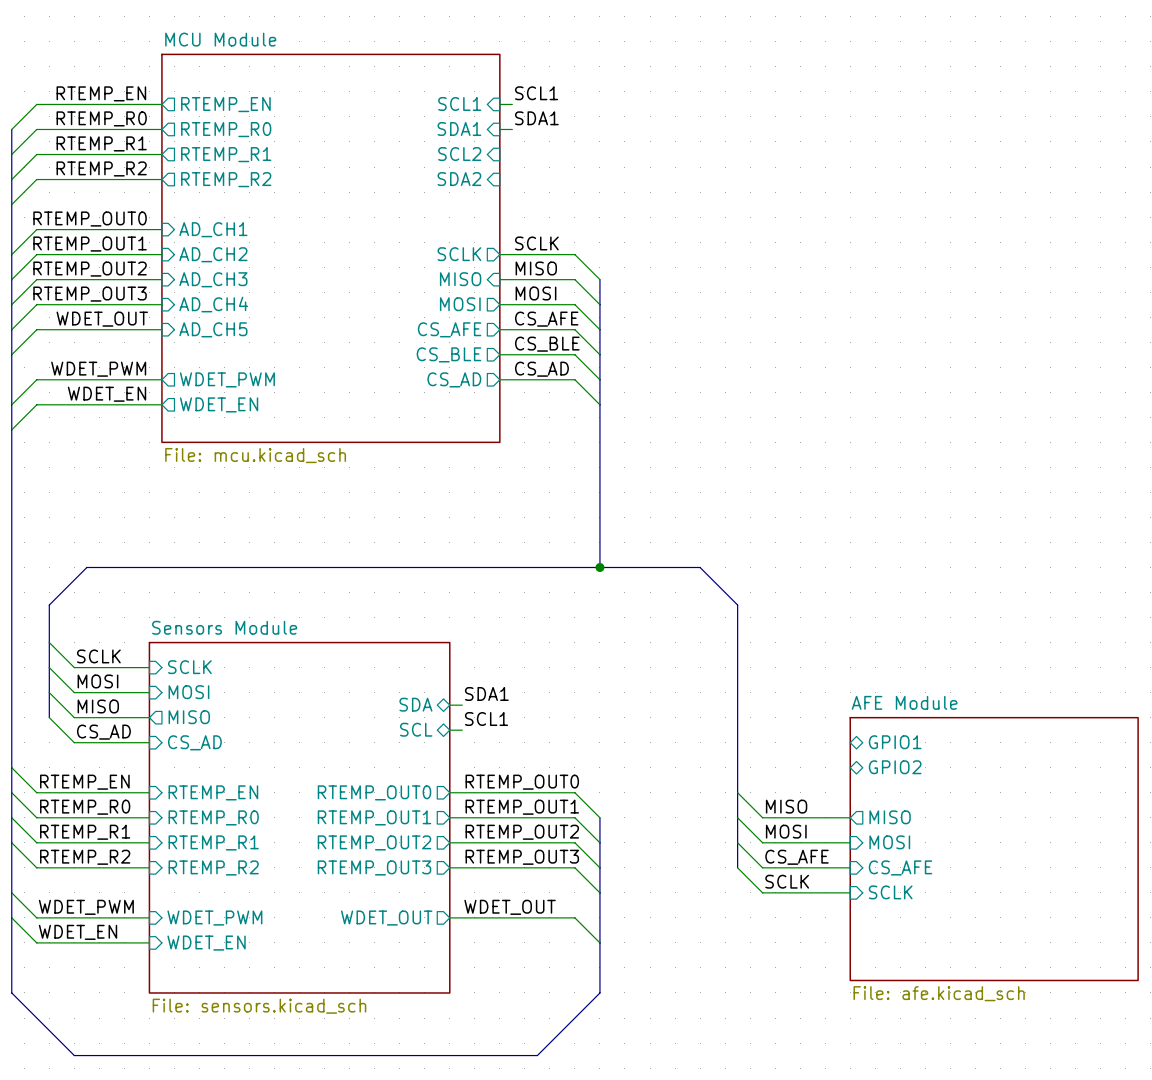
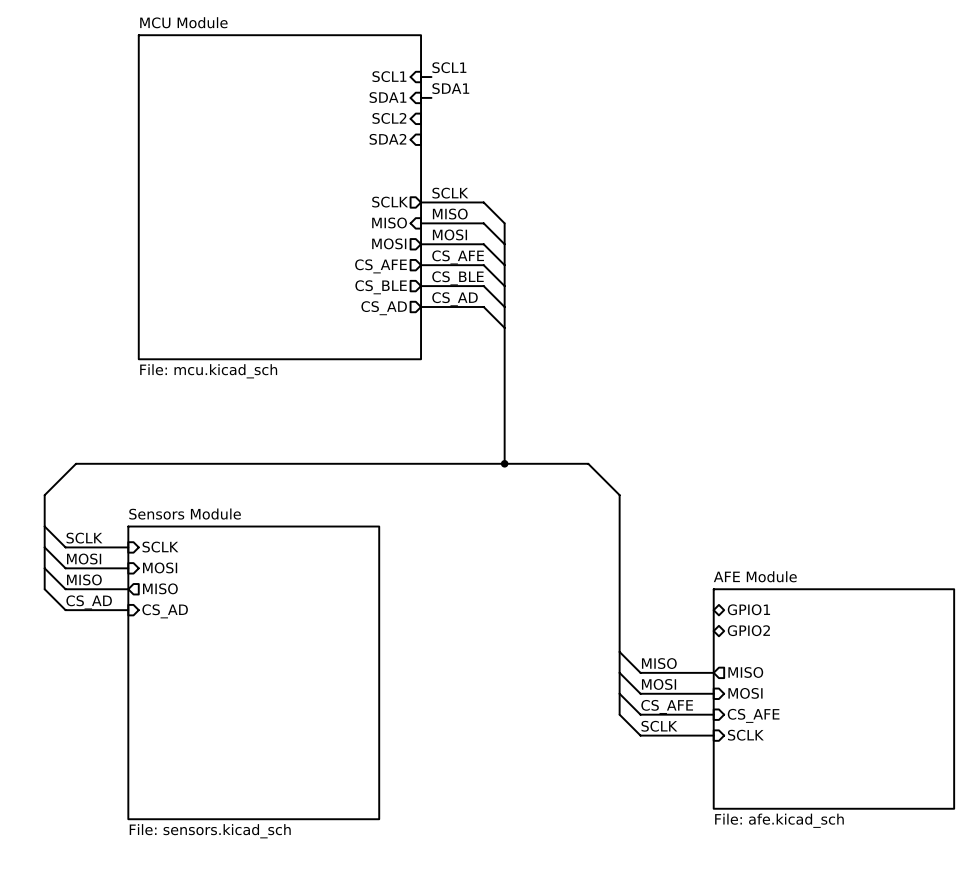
label: RTEMP_EN (101, 93) -> none
wire: (161, 104) (36, 104) (11, 129) -> none
sheet pin: RTEMP_EN (225, 104) -> none
label: RTEMP_R0 (101, 118) -> none
bus: (11, 129) (11, 992) (74, 1055) (537, 1055) (599, 992) (599, 817) -> none
wire: (161, 129) (36, 129) (11, 154) -> none
sheet pin: RTEMP_R0 (226, 129) -> none
label: RTEMP_R1 (101, 143) -> none
wire: (161, 154) (36, 154) (11, 179) -> none
sheet pin: RTEMP_R1 (226, 154) -> none
label: RTEMP_R2 (101, 168) -> none
wire: (161, 179) (36, 179) (11, 204) -> none
sheet pin: RTEMP_R2 (226, 179) -> none
label: RTEMP_OUT0 (90, 219) -> none
wire: (161, 229) (36, 229) (11, 254) -> none
sheet pin: AD_CH1 (213, 229) -> none
label: RTEMP_OUT1 (90, 244) -> none
wire: (161, 254) (36, 254) (11, 279) -> none
sheet pin: AD_CH2 (213, 254) -> none
label: RTEMP_OUT2 (90, 269) -> none
wire: (161, 279) (36, 279) (11, 304) -> none
sheet pin: AD_CH3 (213, 279) -> none
label: RTEMP_OUT3 (90, 294) -> none
wire: (161, 304) (36, 304) (11, 329) -> none
sheet pin: AD_CH4 (213, 304) -> none
label: WDET_OUT (102, 319) -> none
wire: (161, 329) (36, 329) (11, 354) -> none
sheet pin: AD_CH5 (213, 329) -> none
label: WDET_PWM (98, 369) -> none
wire: (161, 379) (36, 379) (11, 404) -> none
sheet pin: WDET_PWM (227, 379) -> none
label: WDET_EN (107, 394) -> none
wire: (161, 404) (36, 404) (11, 429) -> none
sheet pin: WDET_EN (219, 404) -> none
label: SDA1 (486, 693) -> none
sheet pin: SDA (415, 704) -> none
wire: (449, 705) (462, 705) -> none
label: SCL1 (486, 719) -> none
sheet pin: SCL (416, 729) -> none
wire: (449, 730) (462, 730) -> none
wire: (11, 767) (36, 792) (149, 792) -> none
label: RTEMP_EN (84, 782) -> none
label: RTEMP_OUT0 (522, 782) -> none
wire: (11, 792) (36, 817) (149, 817) -> none
sheet pin: RTEMP_EN (213, 792) -> none
sheet pin: RTEMP_OUT0 (374, 792) -> none
wire: (449, 792) (574, 792) (599, 817) -> none
label: RTEMP_R0 (85, 807) -> none
label: RTEMP_OUT1 (522, 807) -> none
wire: (11, 817) (36, 842) (149, 842) -> none
sheet pin: RTEMP_R0 (213, 817) -> none
sheet pin: RTEMP_OUT1 (374, 817) -> none
wire: (449, 817) (574, 817) (599, 842) -> none
label: RTEMP_R1 (85, 832) -> none
label: RTEMP_OUT2 (522, 832) -> none
wire: (11, 842) (36, 867) (149, 867) -> none
sheet pin: RTEMP_R1 (213, 842) -> none
sheet pin: RTEMP_OUT2 (374, 842) -> none
wire: (449, 842) (574, 842) (599, 867) -> none
label: RTEMP_R2 (85, 857) -> none
label: RTEMP_OUT3 (522, 857) -> none
sheet pin: RTEMP_R2 (213, 867) -> none
sheet pin: RTEMP_OUT3 (374, 867) -> none
wire: (449, 867) (574, 867) (599, 892) -> none
wire: (11, 892) (36, 917) (149, 917) -> none
label: WDET_PWM (86, 907) -> none
label: WDET_OUT (510, 907) -> none
wire: (11, 917) (36, 942) (149, 942) -> none
wire: (449, 917) (574, 917) (599, 942) -> none
sheet pin: WDET_PWM (214, 918) -> none
sheet pin: WDET_OUT (386, 918) -> none
label: WDET_EN (78, 932) -> none
sheet pin: WDET_EN (206, 943) -> none

